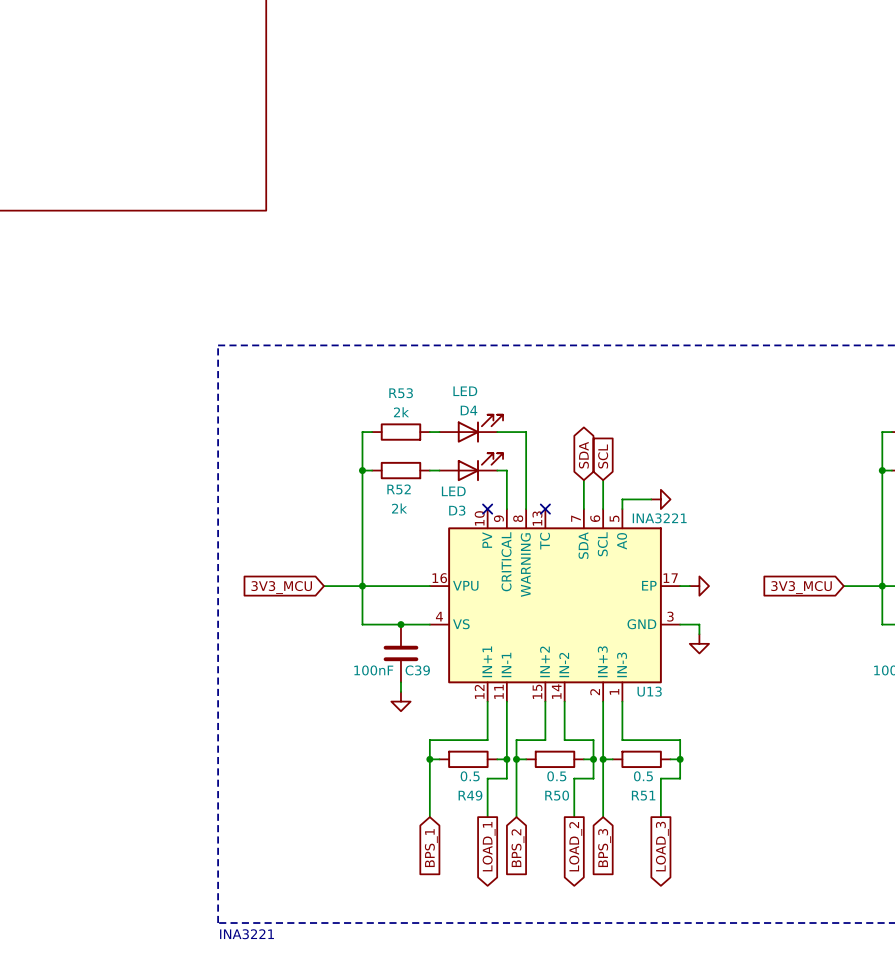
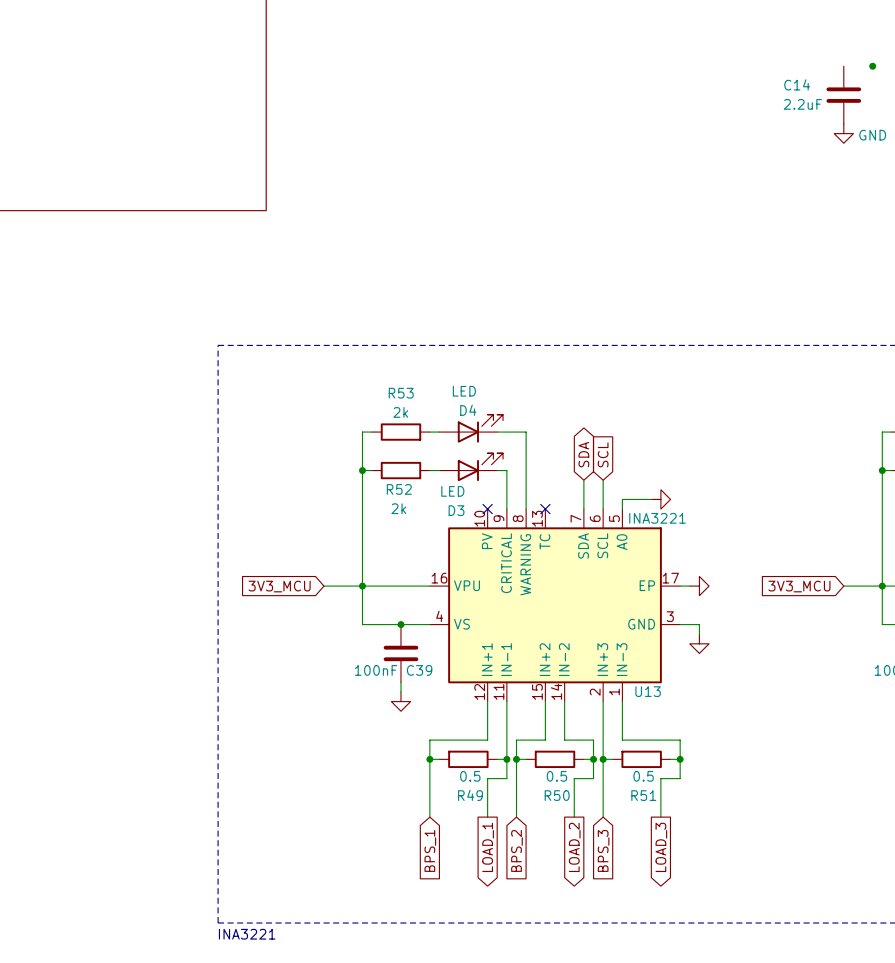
junction: none -> (872, 66)
C14: none -> 2.2uF (843, 95)
power symbol: none -> GND (843, 133)

